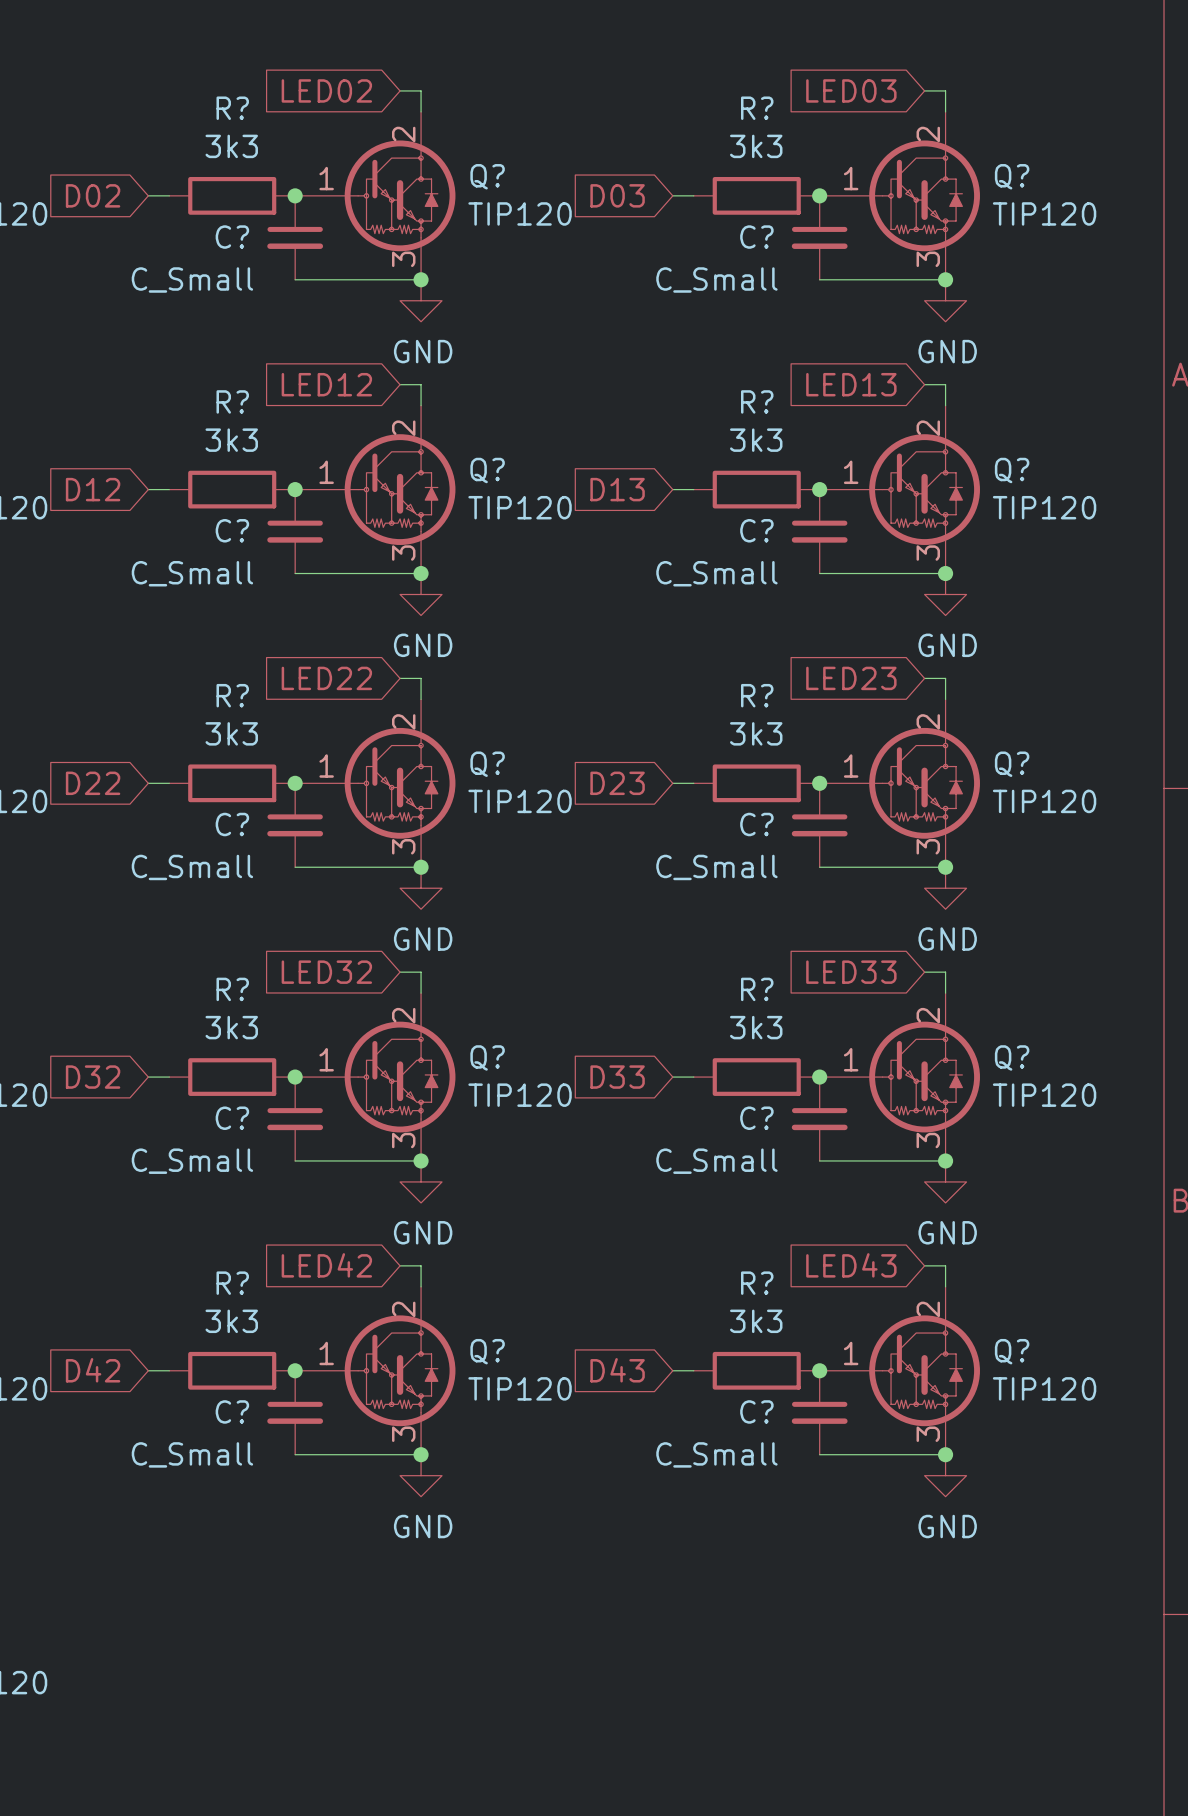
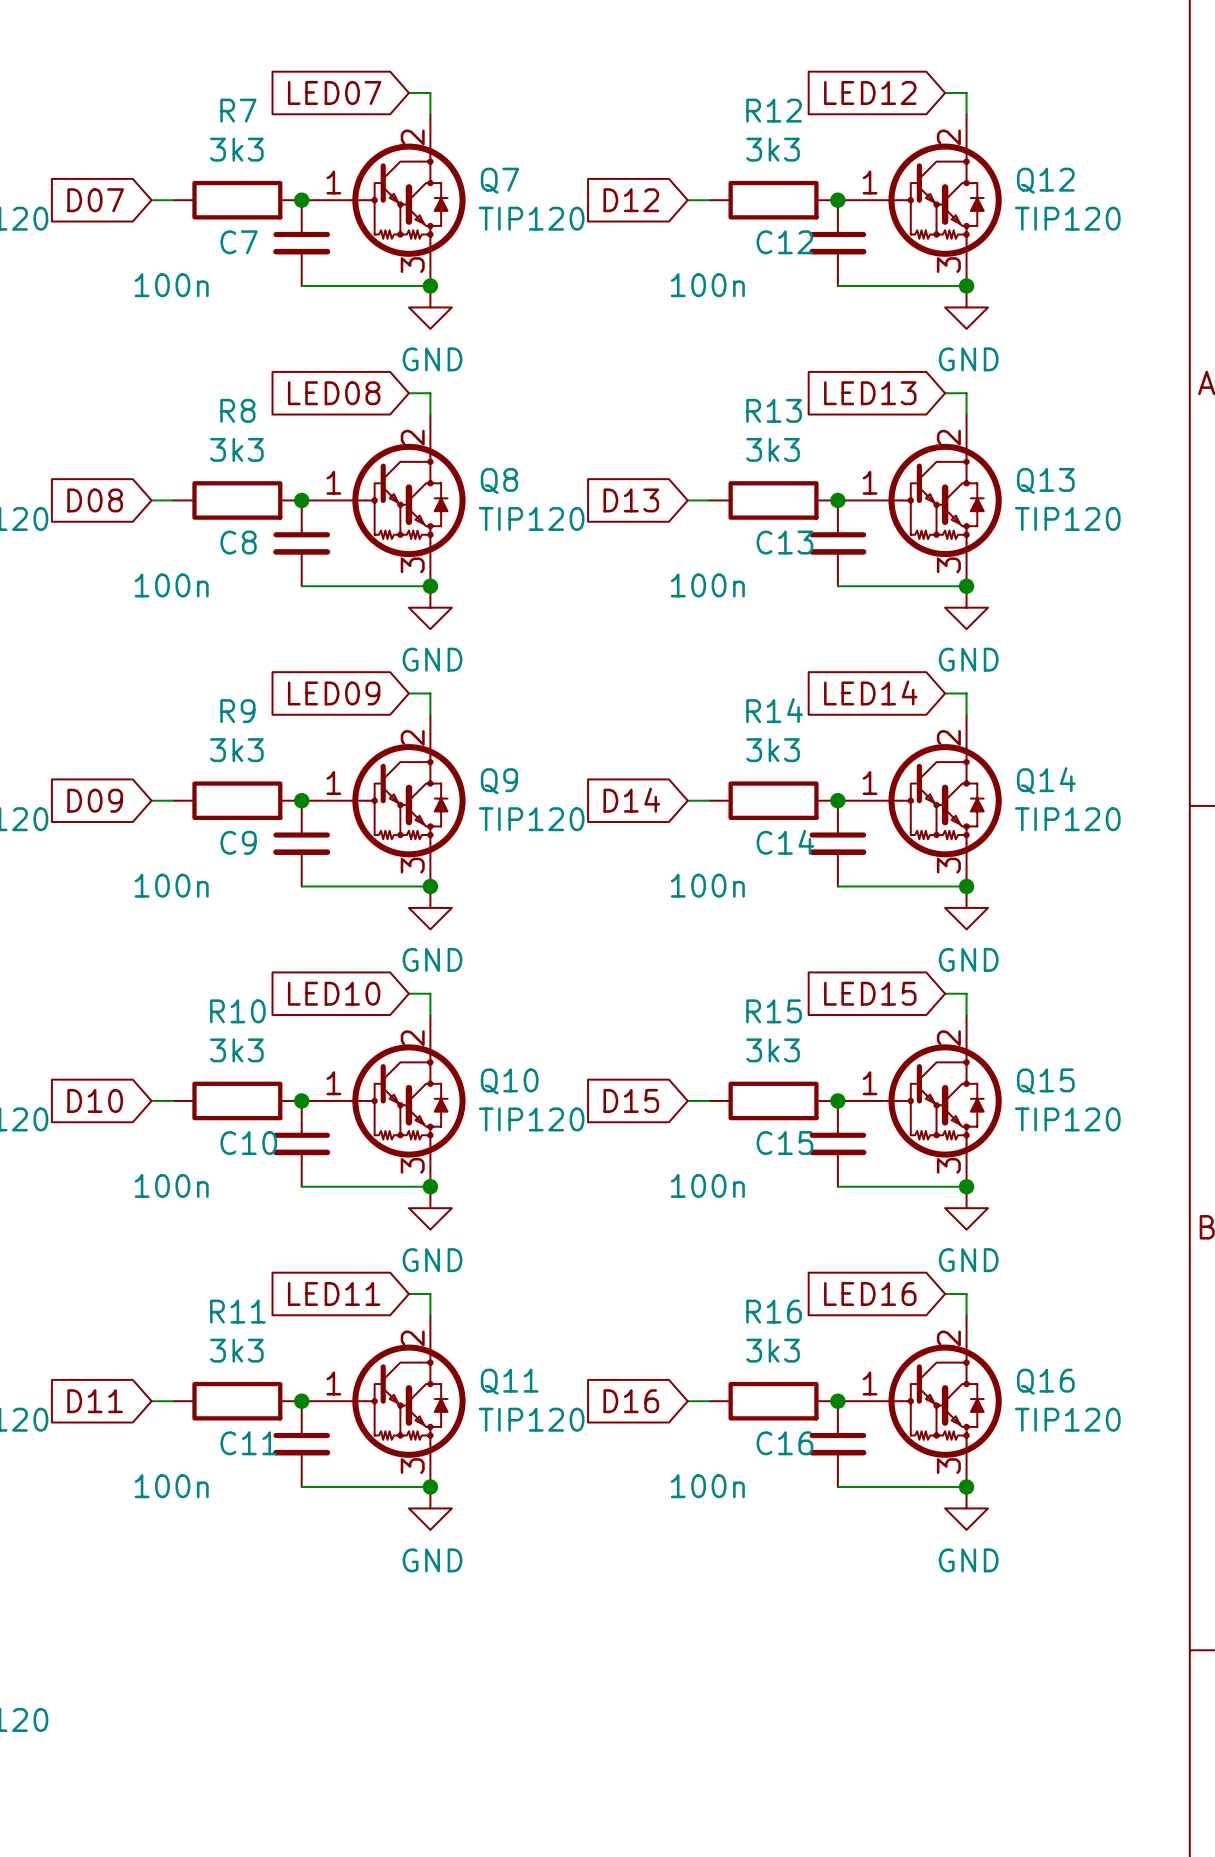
global label: LED02 (326, 90) -> LED07 (334, 92)
global label: LED03 (851, 90) -> LED12 (870, 92)
R? name: R? (232, 108) -> R7 (238, 110)
R? name: R? (757, 108) -> R12 (774, 110)
Q? name: Q? (487, 176) -> Q7 (499, 180)
Q? name: Q? (1012, 176) -> Q12 (1045, 180)
global label: D02 (93, 195) -> D07 (95, 200)
global label: D03 (617, 195) -> D12 (631, 200)
C? name: C? (232, 237) -> C7 (239, 242)
C? name: C? (756, 237) -> C12 (784, 242)
C? value: C_Small (192, 280) -> 100n (171, 285)
C? value: C_Small (716, 280) -> 100n (707, 285)
global label: LED12 (326, 384) -> LED08 (334, 393)
R? name: R? (232, 401) -> R8 (237, 410)
R? name: R? (757, 401) -> R13 (774, 410)
Q? name: Q? (487, 470) -> Q8 (499, 480)
Q? name: Q? (1012, 470) -> Q13 (1045, 480)
global label: D12 (93, 489) -> D08 (95, 500)
C? name: C? (232, 530) -> C8 (238, 542)
C? name: C? (756, 530) -> C13 (784, 542)
C? value: C_Small (192, 573) -> 100n (171, 585)
C? value: C_Small (716, 573) -> 100n (707, 585)
global label: LED22 (326, 678) -> LED09 (334, 693)
global label: LED23 (851, 678) -> LED14 (870, 692)
R? name: R? (232, 695) -> R9 (237, 711)
R? name: R? (757, 695) -> R14 (774, 710)
Q? name: Q? (487, 764) -> Q9 (499, 781)
Q? name: Q? (1012, 764) -> Q14 (1046, 780)
global label: D22 (93, 783) -> D09 (95, 800)
global label: D23 (617, 783) -> D14 (631, 800)
C? name: C? (232, 824) -> C9 (238, 842)
C? name: C? (756, 824) -> C14 (785, 842)
C? value: C_Small (192, 867) -> 100n (171, 885)
C? value: C_Small (716, 867) -> 100n (707, 885)
global label: LED32 (326, 972) -> LED10 (334, 993)
global label: LED33 (851, 972) -> LED15 (870, 993)
R? name: R? (232, 989) -> R10 (237, 1011)
R? name: R? (757, 989) -> R15 (774, 1011)
Q? name: Q? (487, 1057) -> Q10 (509, 1081)
Q? name: Q? (1012, 1057) -> Q15 (1045, 1081)
global label: D32 (93, 1077) -> D10 (95, 1100)
global label: D33 (617, 1077) -> D15 (631, 1100)
C? name: C? (232, 1118) -> C10 (248, 1143)
C? name: C? (756, 1118) -> C15 (784, 1143)
C? value: C_Small (192, 1161) -> 100n (171, 1185)
C? value: C_Small (716, 1161) -> 100n (707, 1185)
global label: LED42 (326, 1265) -> LED11 (334, 1293)
global label: LED43 (851, 1265) -> LED16 (870, 1293)
R? name: R? (232, 1283) -> R11 (237, 1311)
R? name: R? (757, 1283) -> R16 (774, 1311)
Q? name: Q? (487, 1351) -> Q11 (509, 1381)
Q? name: Q? (1012, 1351) -> Q16 (1045, 1381)
global label: D42 (93, 1370) -> D11 (95, 1401)
global label: D43 (617, 1370) -> D16 (631, 1401)
C? name: C? (232, 1411) -> C11 (248, 1443)
C? name: C? (756, 1411) -> C16 (784, 1443)
C? value: C_Small (192, 1454) -> 100n (171, 1486)
C? value: C_Small (716, 1454) -> 100n (707, 1486)

